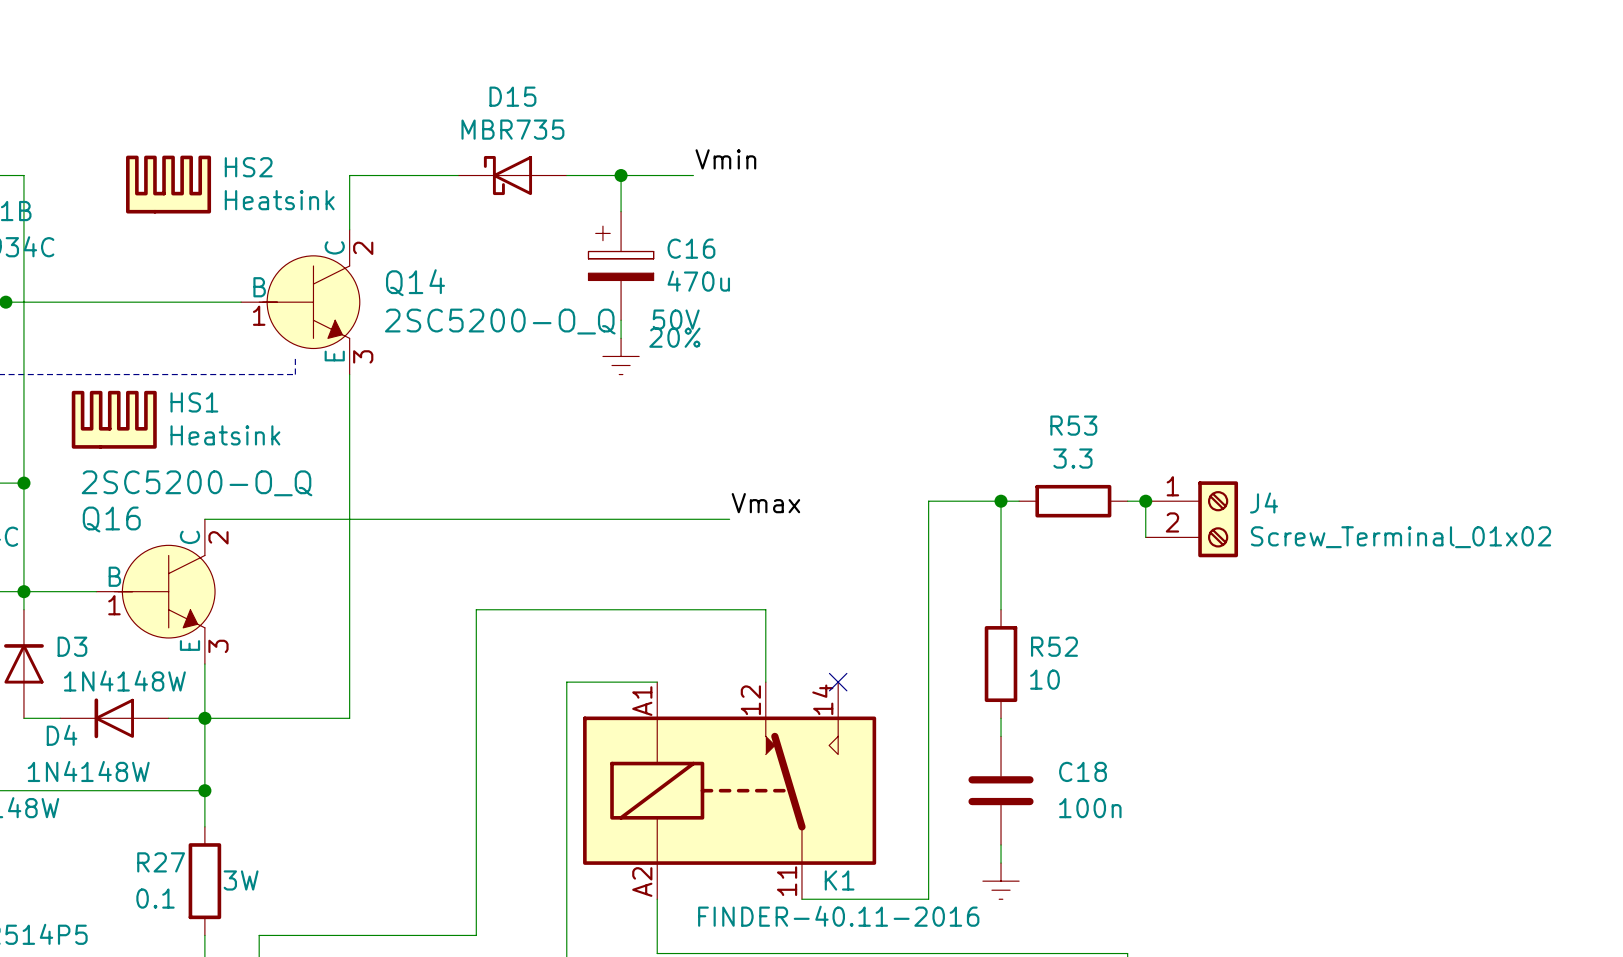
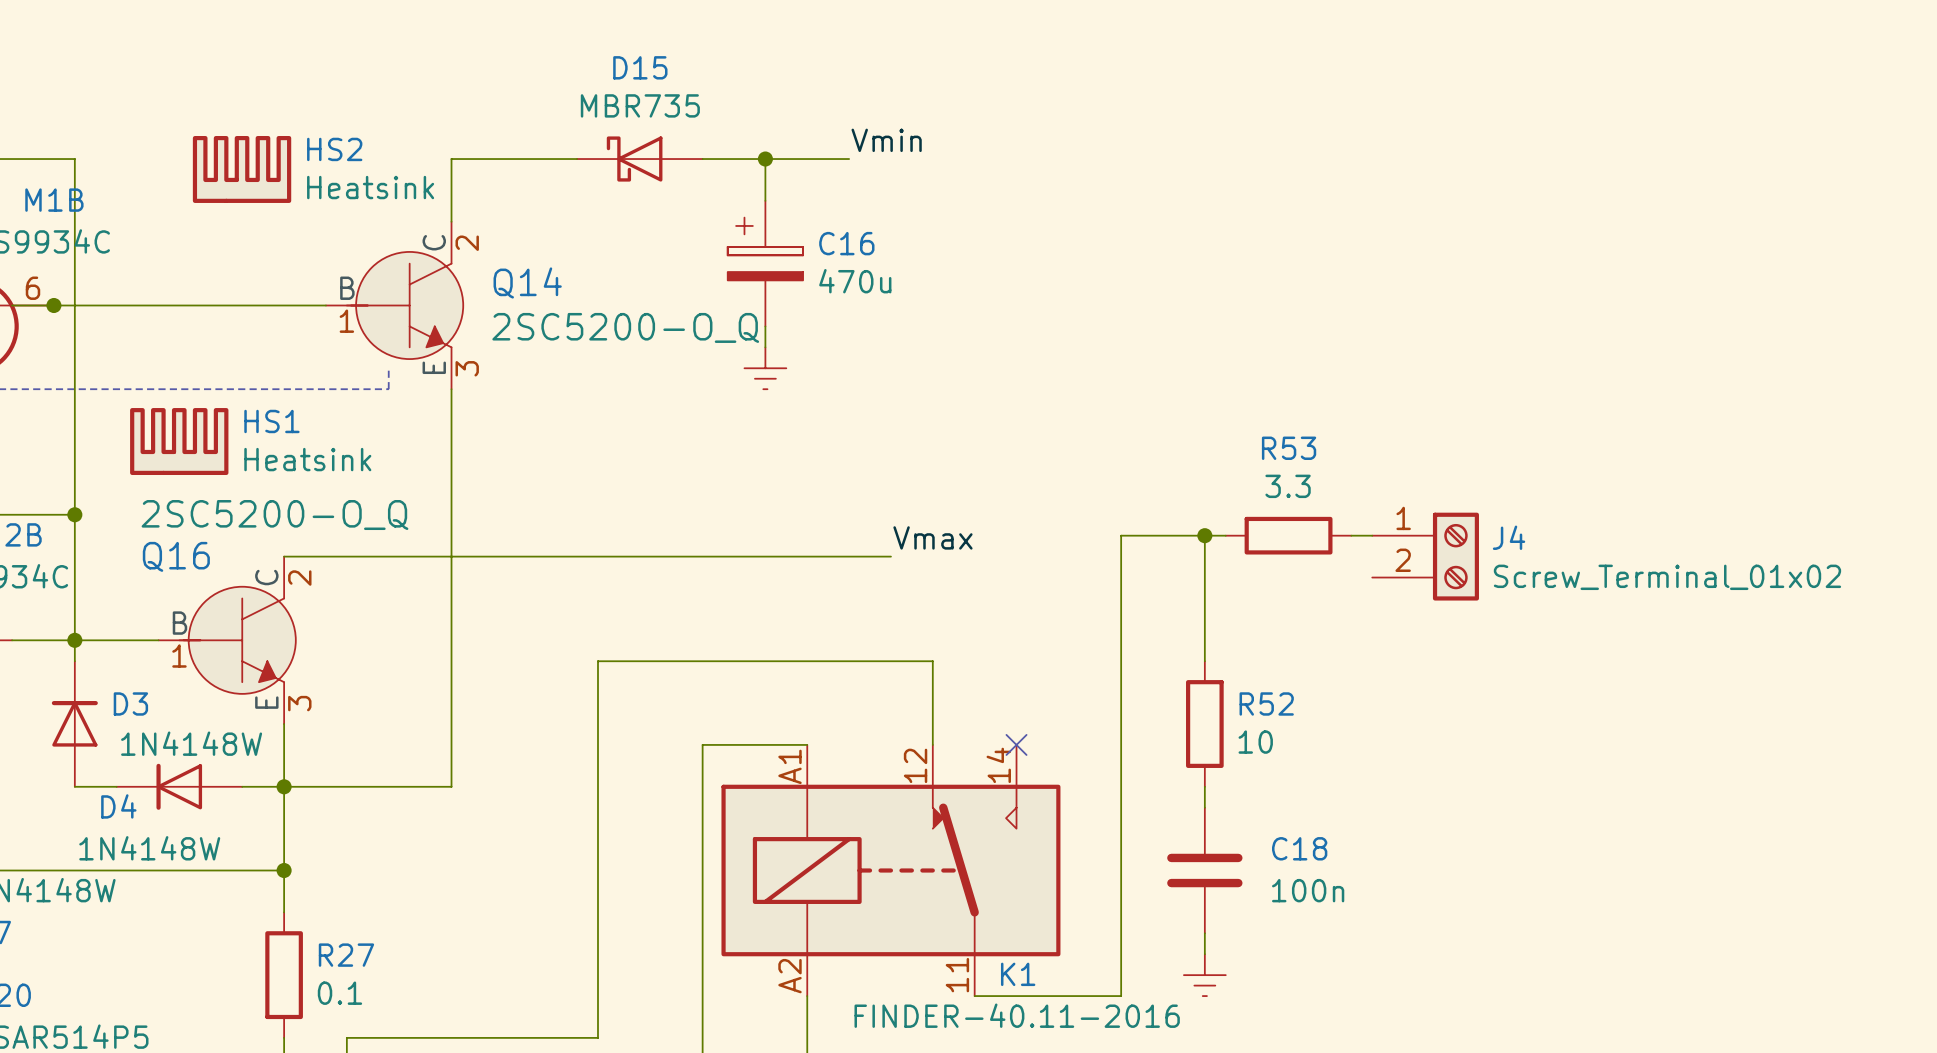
C16 text: 50V (676, 319) -> none
C16 text: 20% (674, 337) -> none
wire: (1145, 501) (1145, 537) -> none
junction: (1145, 501) -> none
R27 name position: R27 (161, 862) -> R27 (346, 955)
R27 text: 3W (241, 880) -> none
R27 value position: 0.1 (155, 898) -> 0.1 (339, 993)

